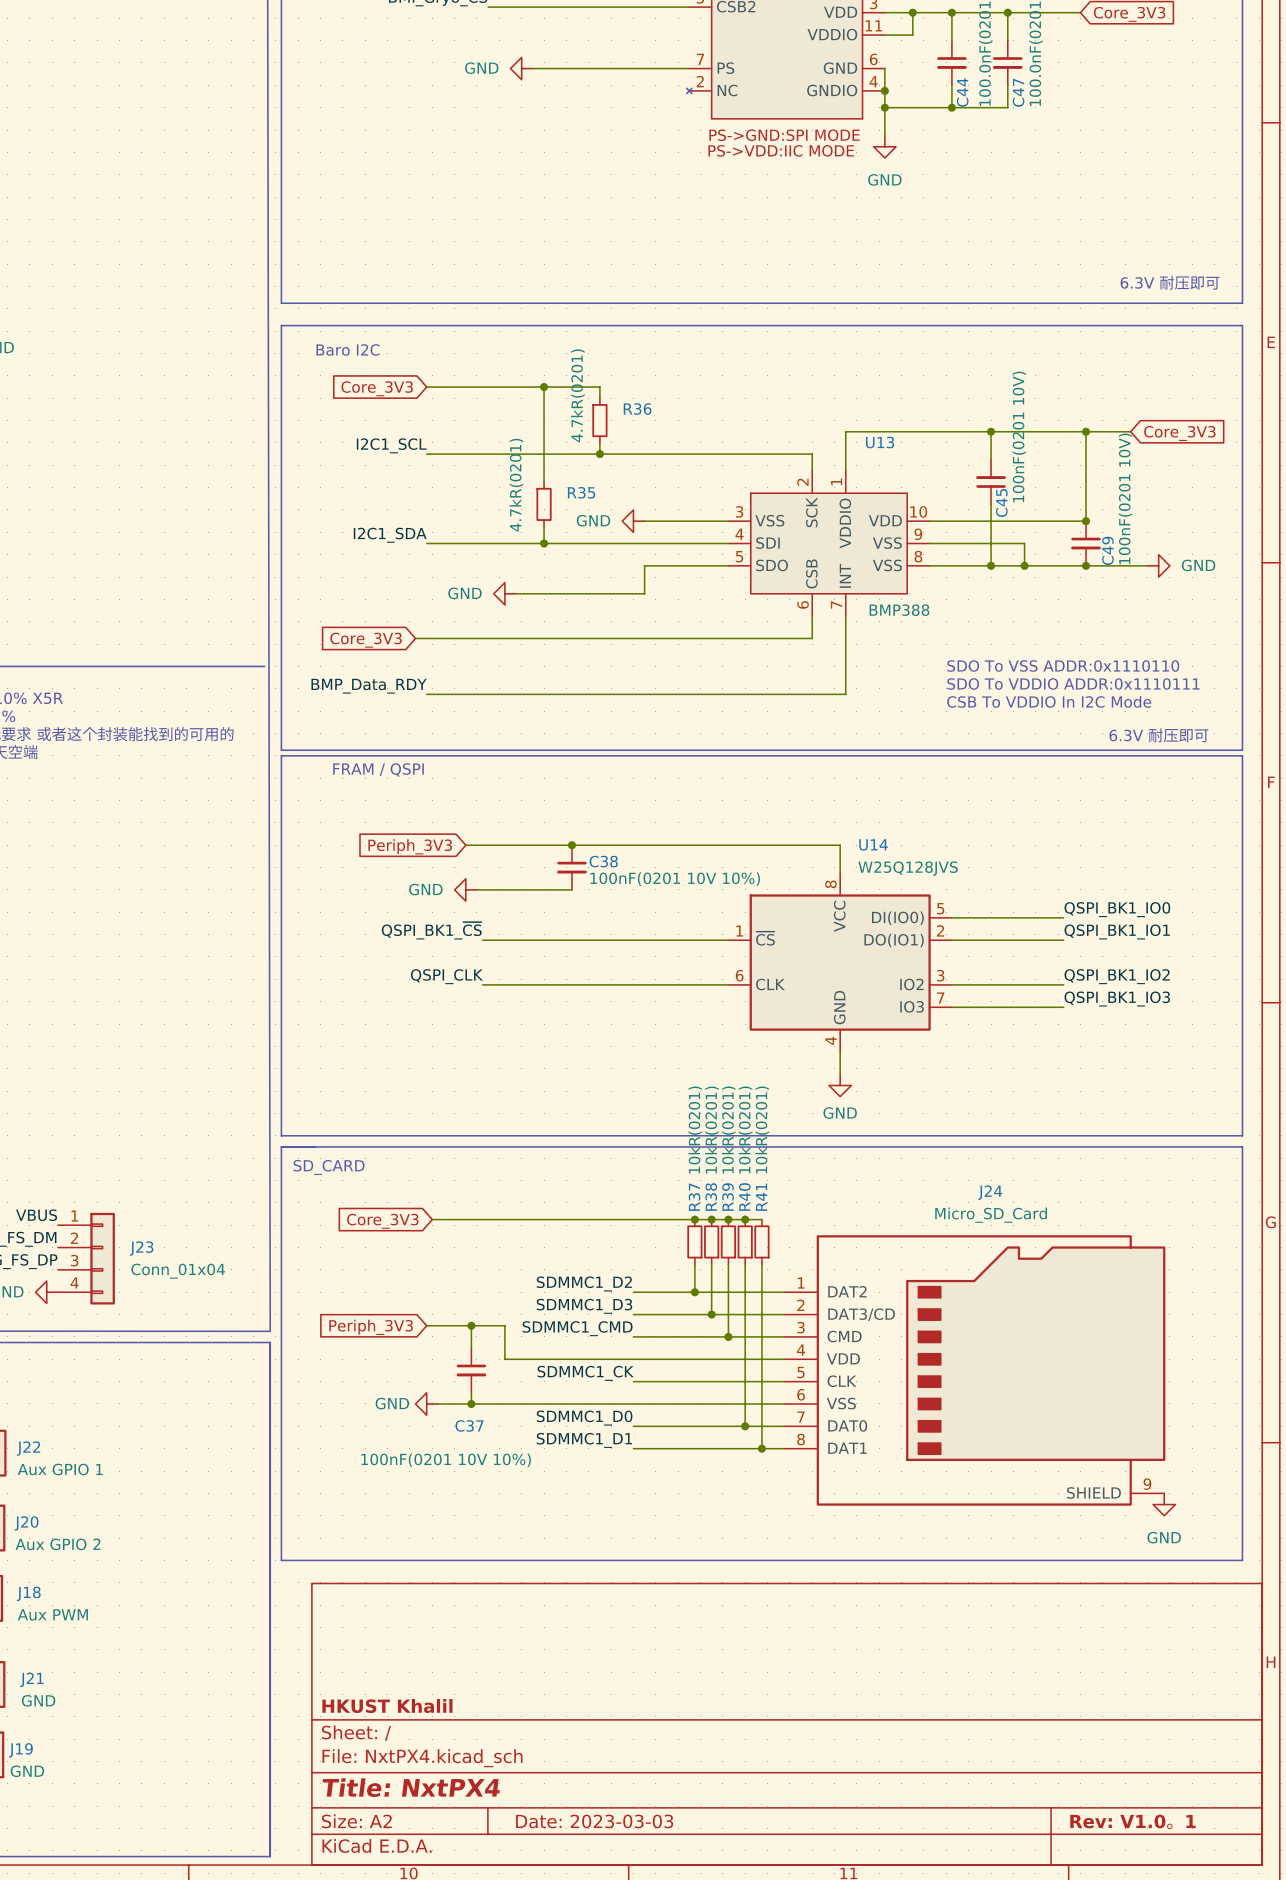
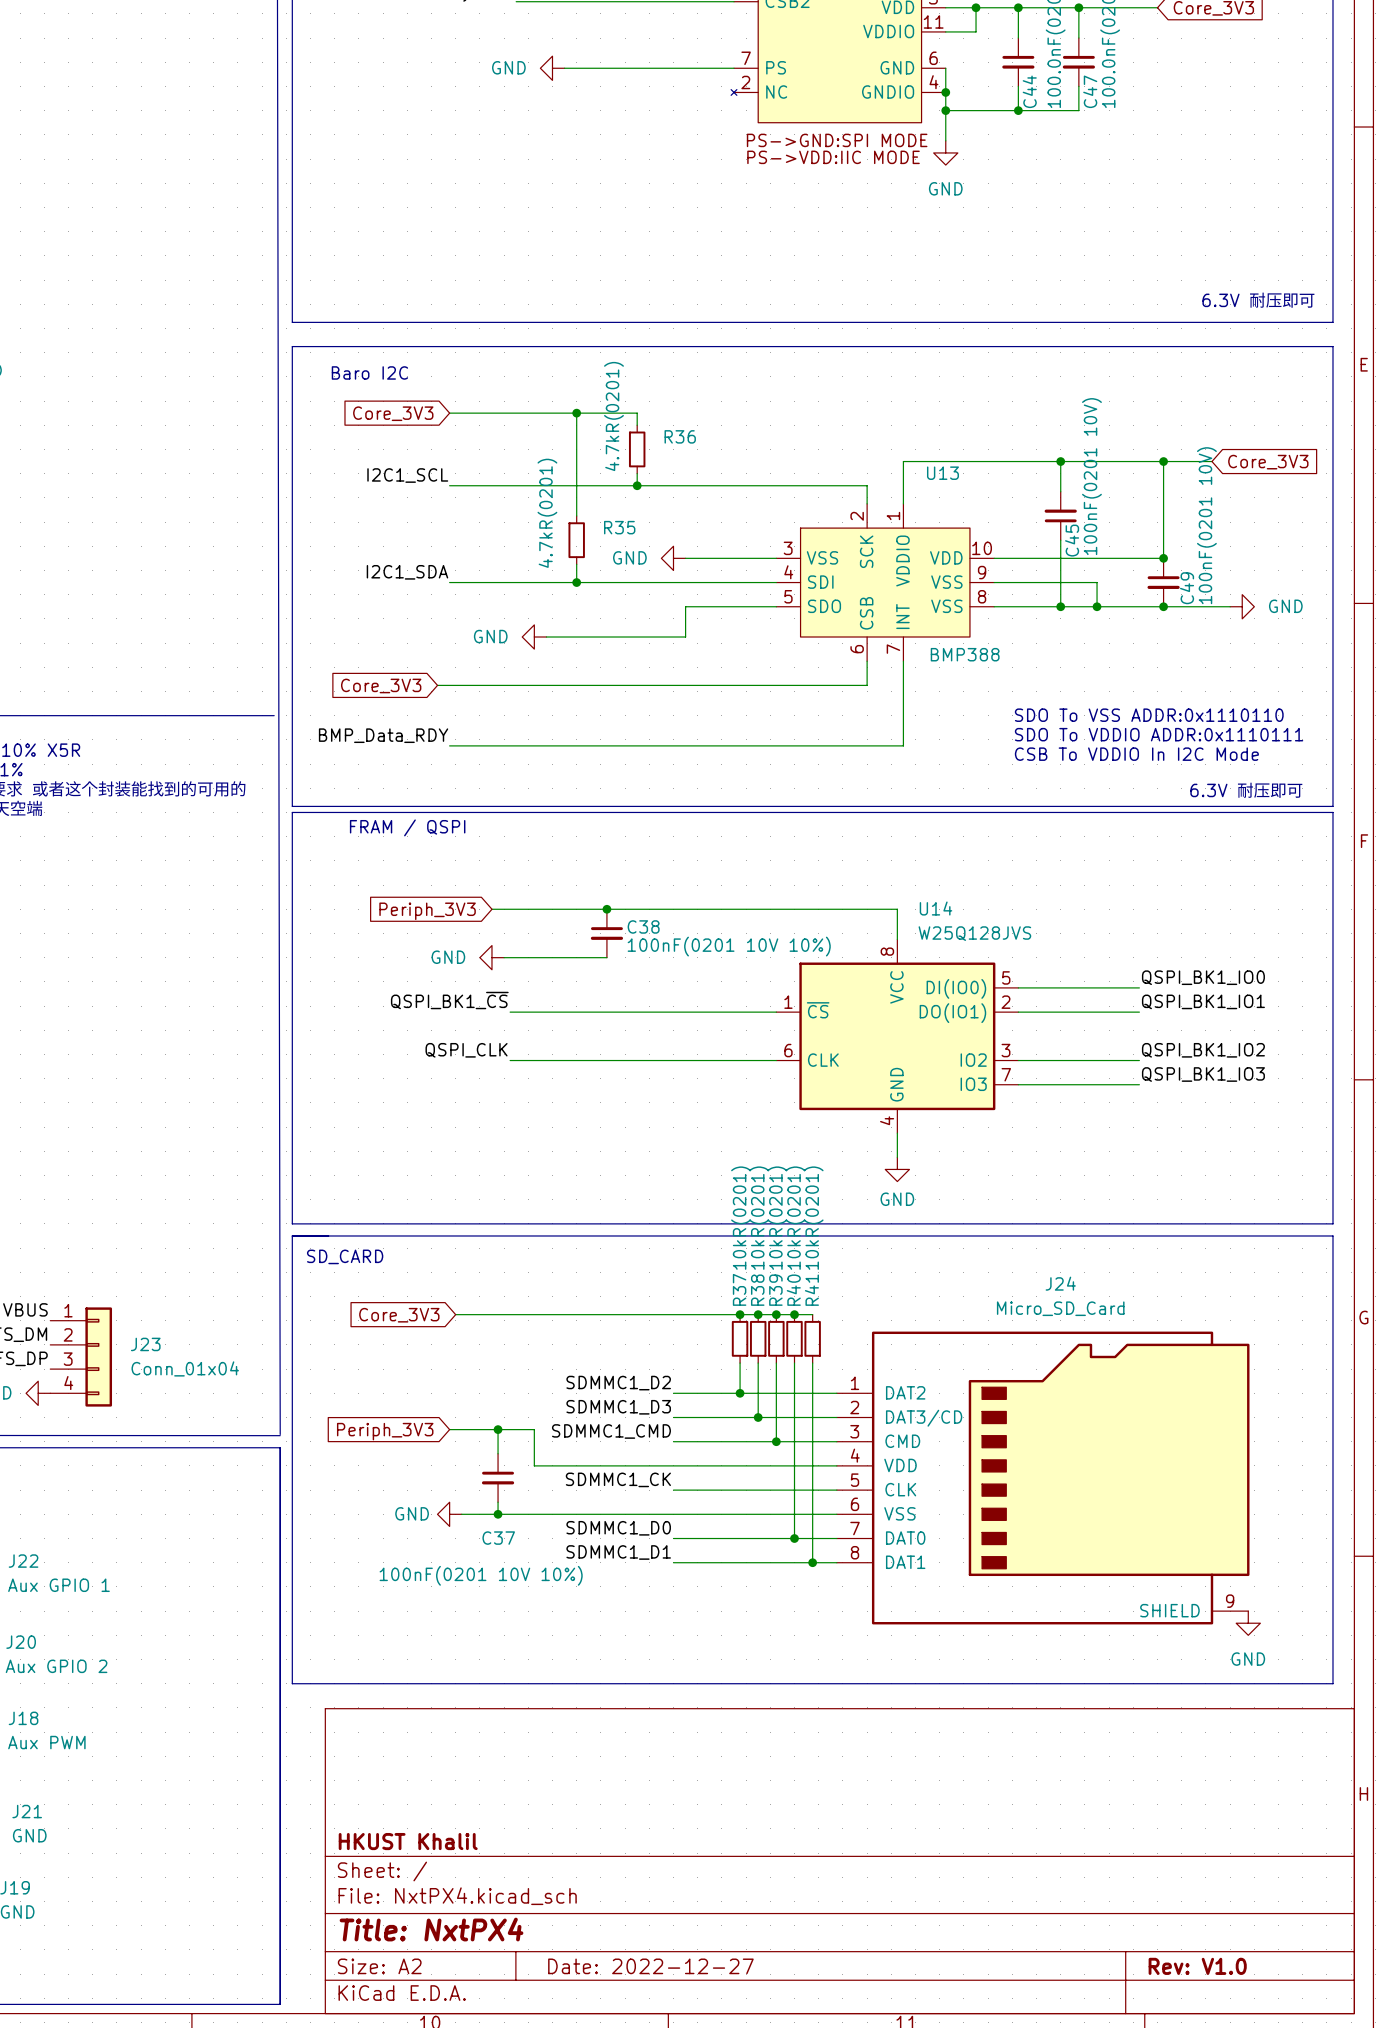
title block: Date: 2023-03-03 (594, 1821) -> Date: 2022-12-27 (650, 1966)
title block: Rev: V1.0。1 (1132, 1821) -> Rev: V1.0 (1197, 1966)

